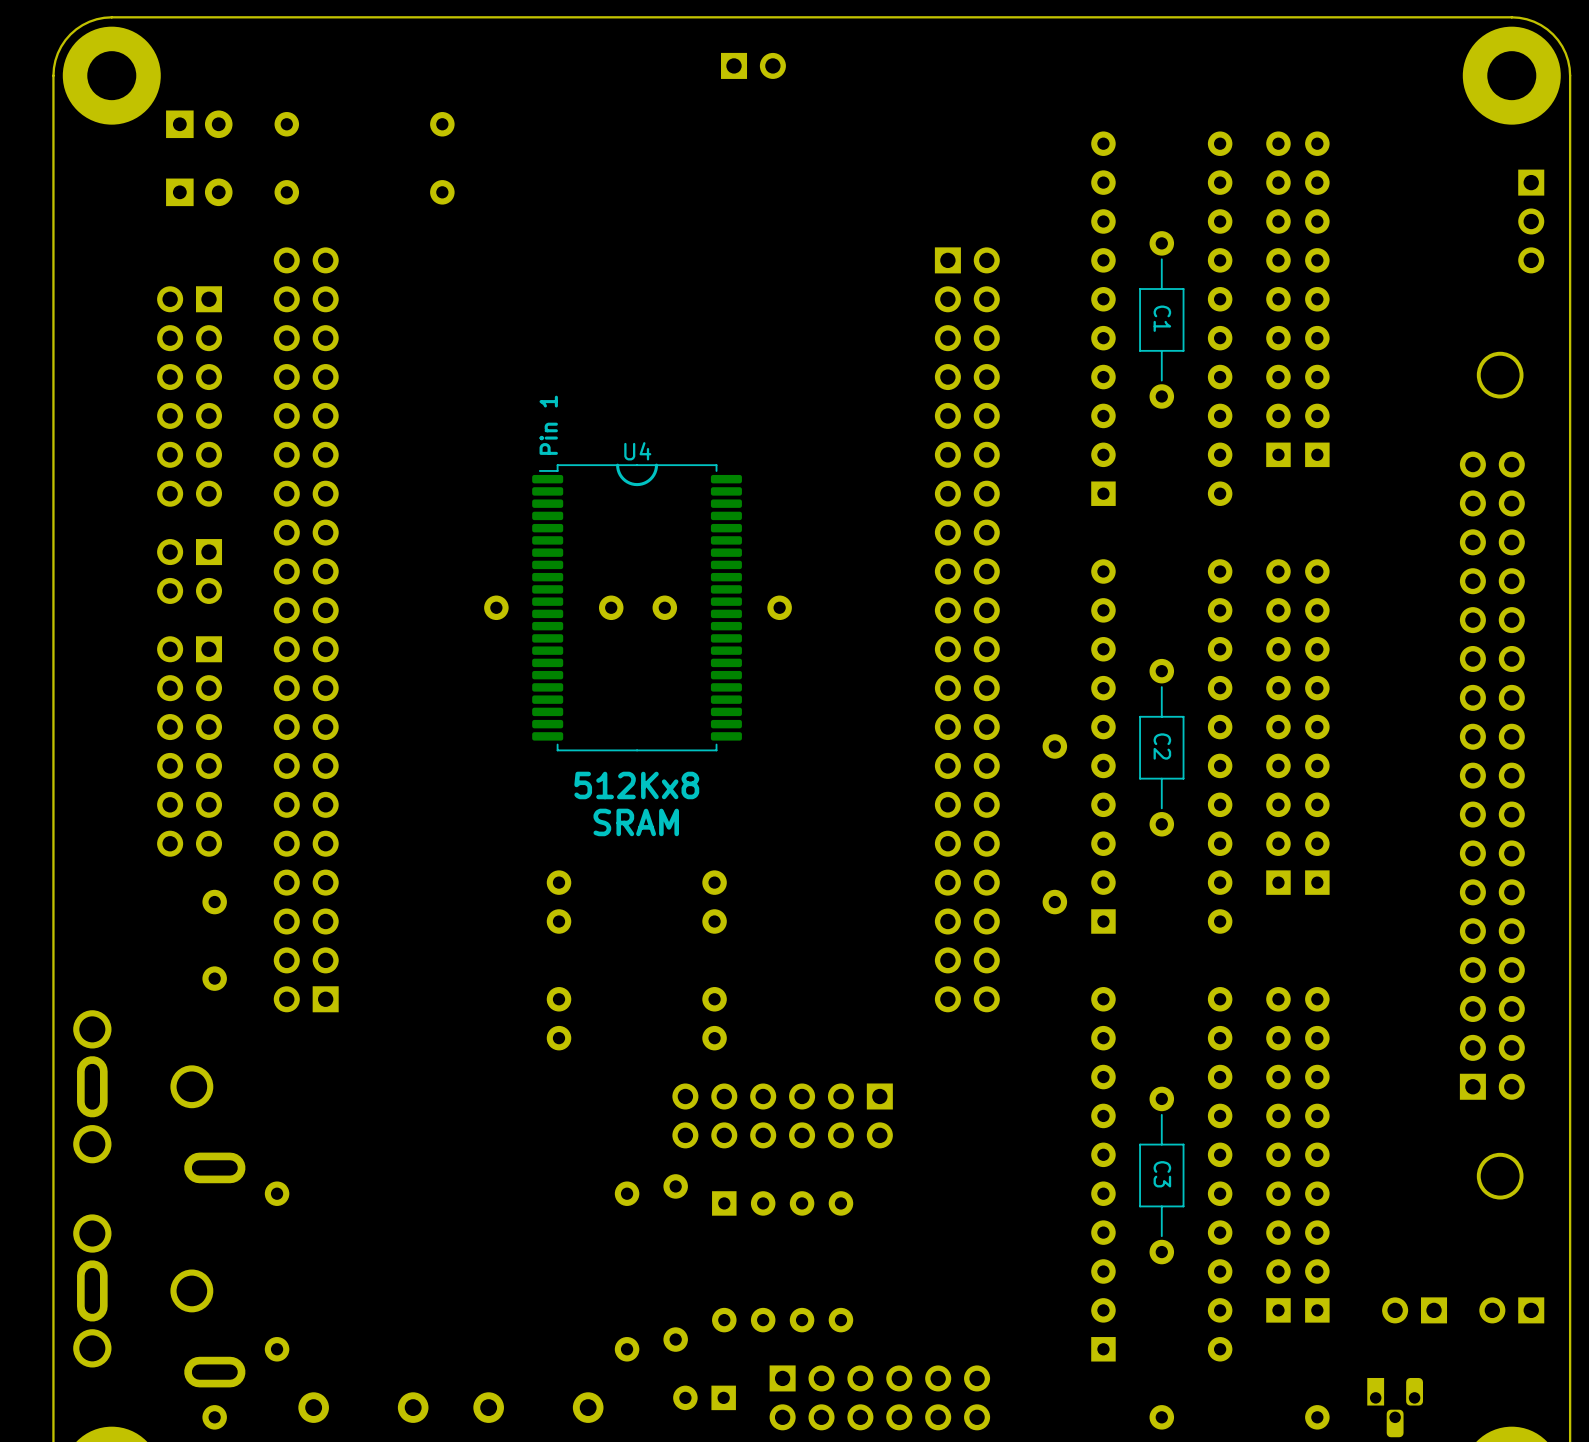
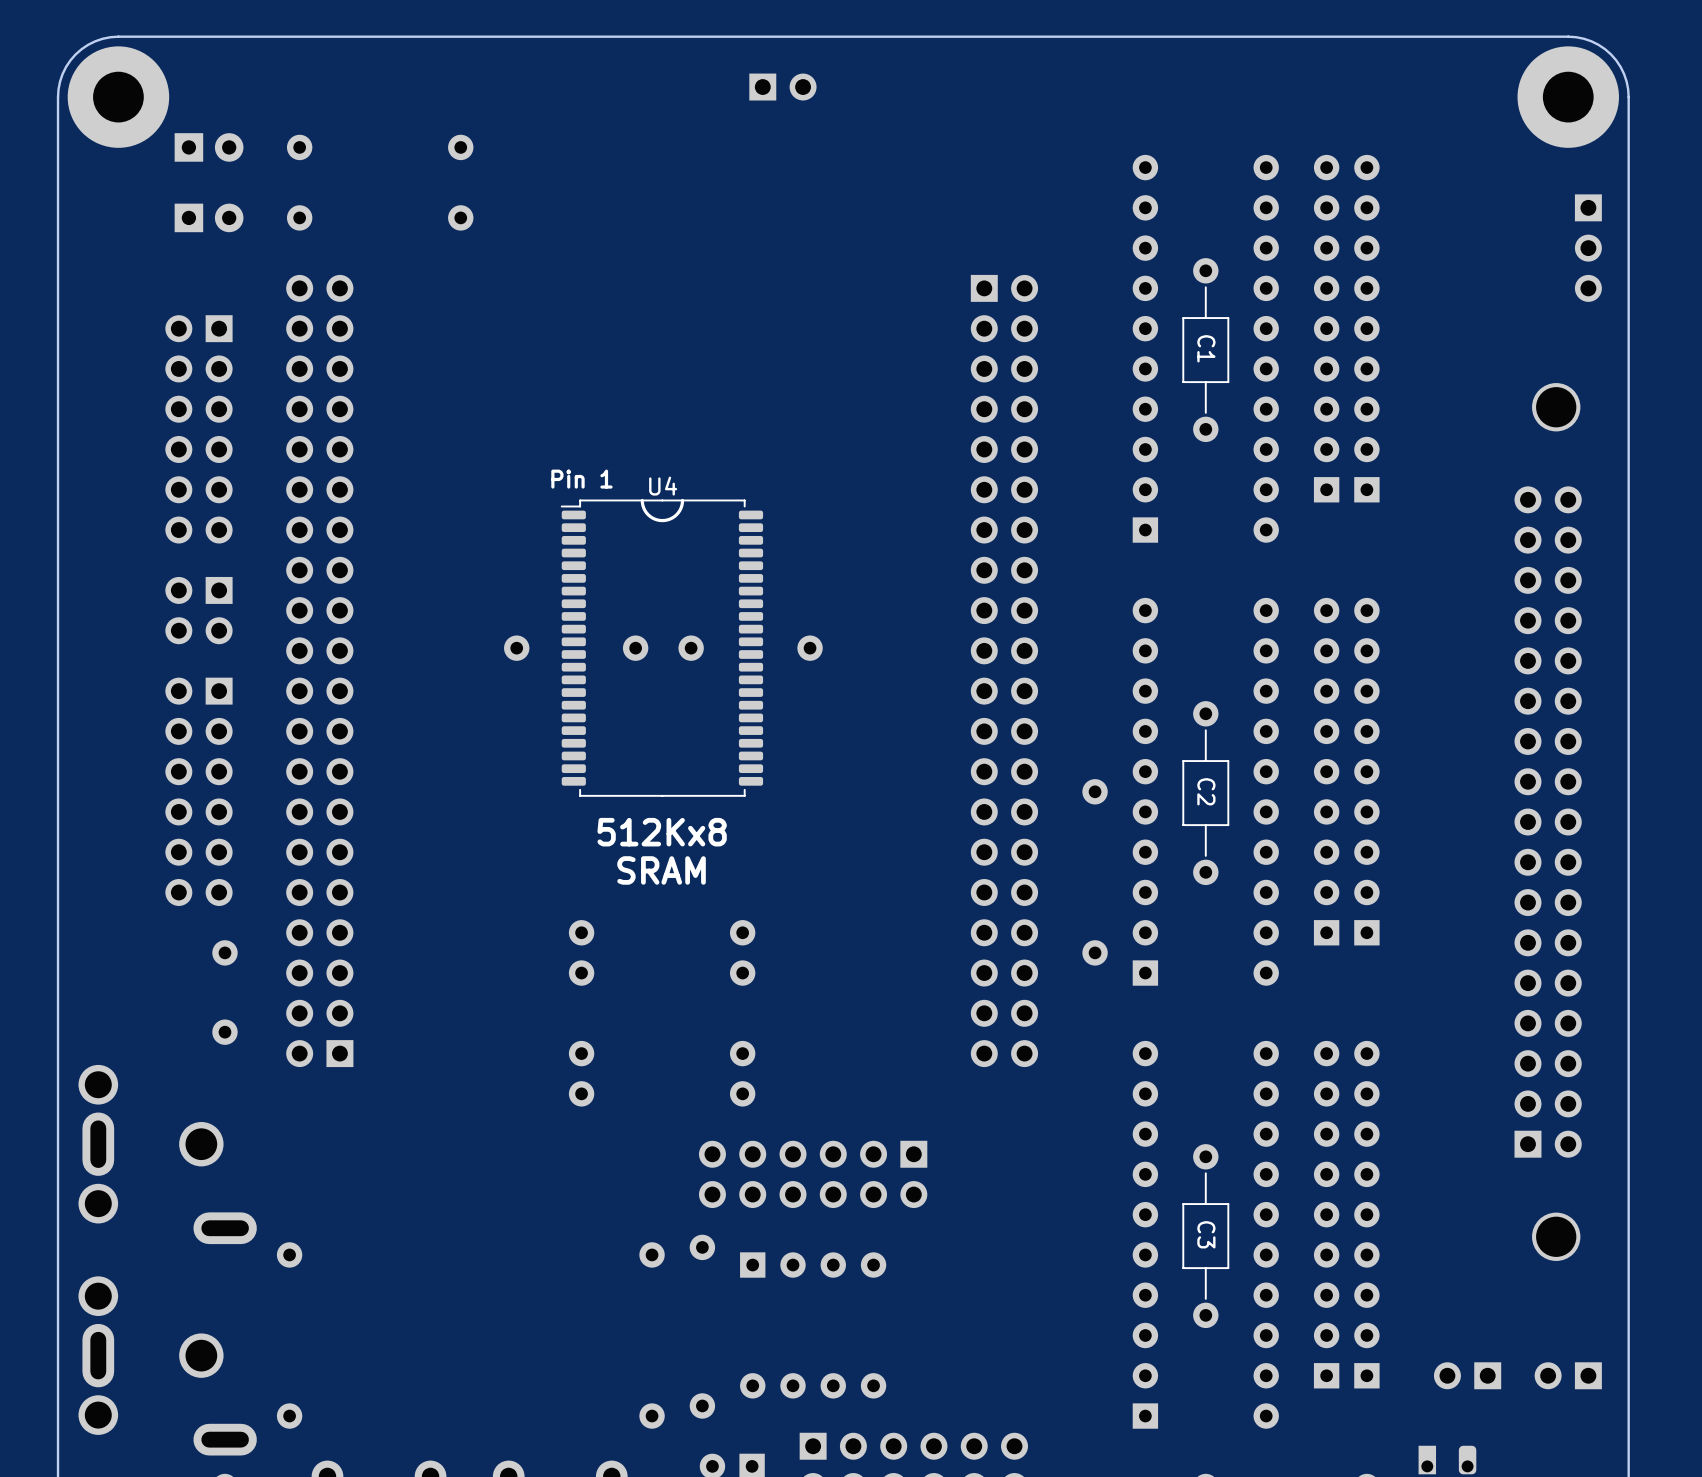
text rotation: 0° (548, 425) -> 90° clockwise (581, 479)
U4 footprint: [532, 464, 742, 752] -> [560, 499, 764, 797]

